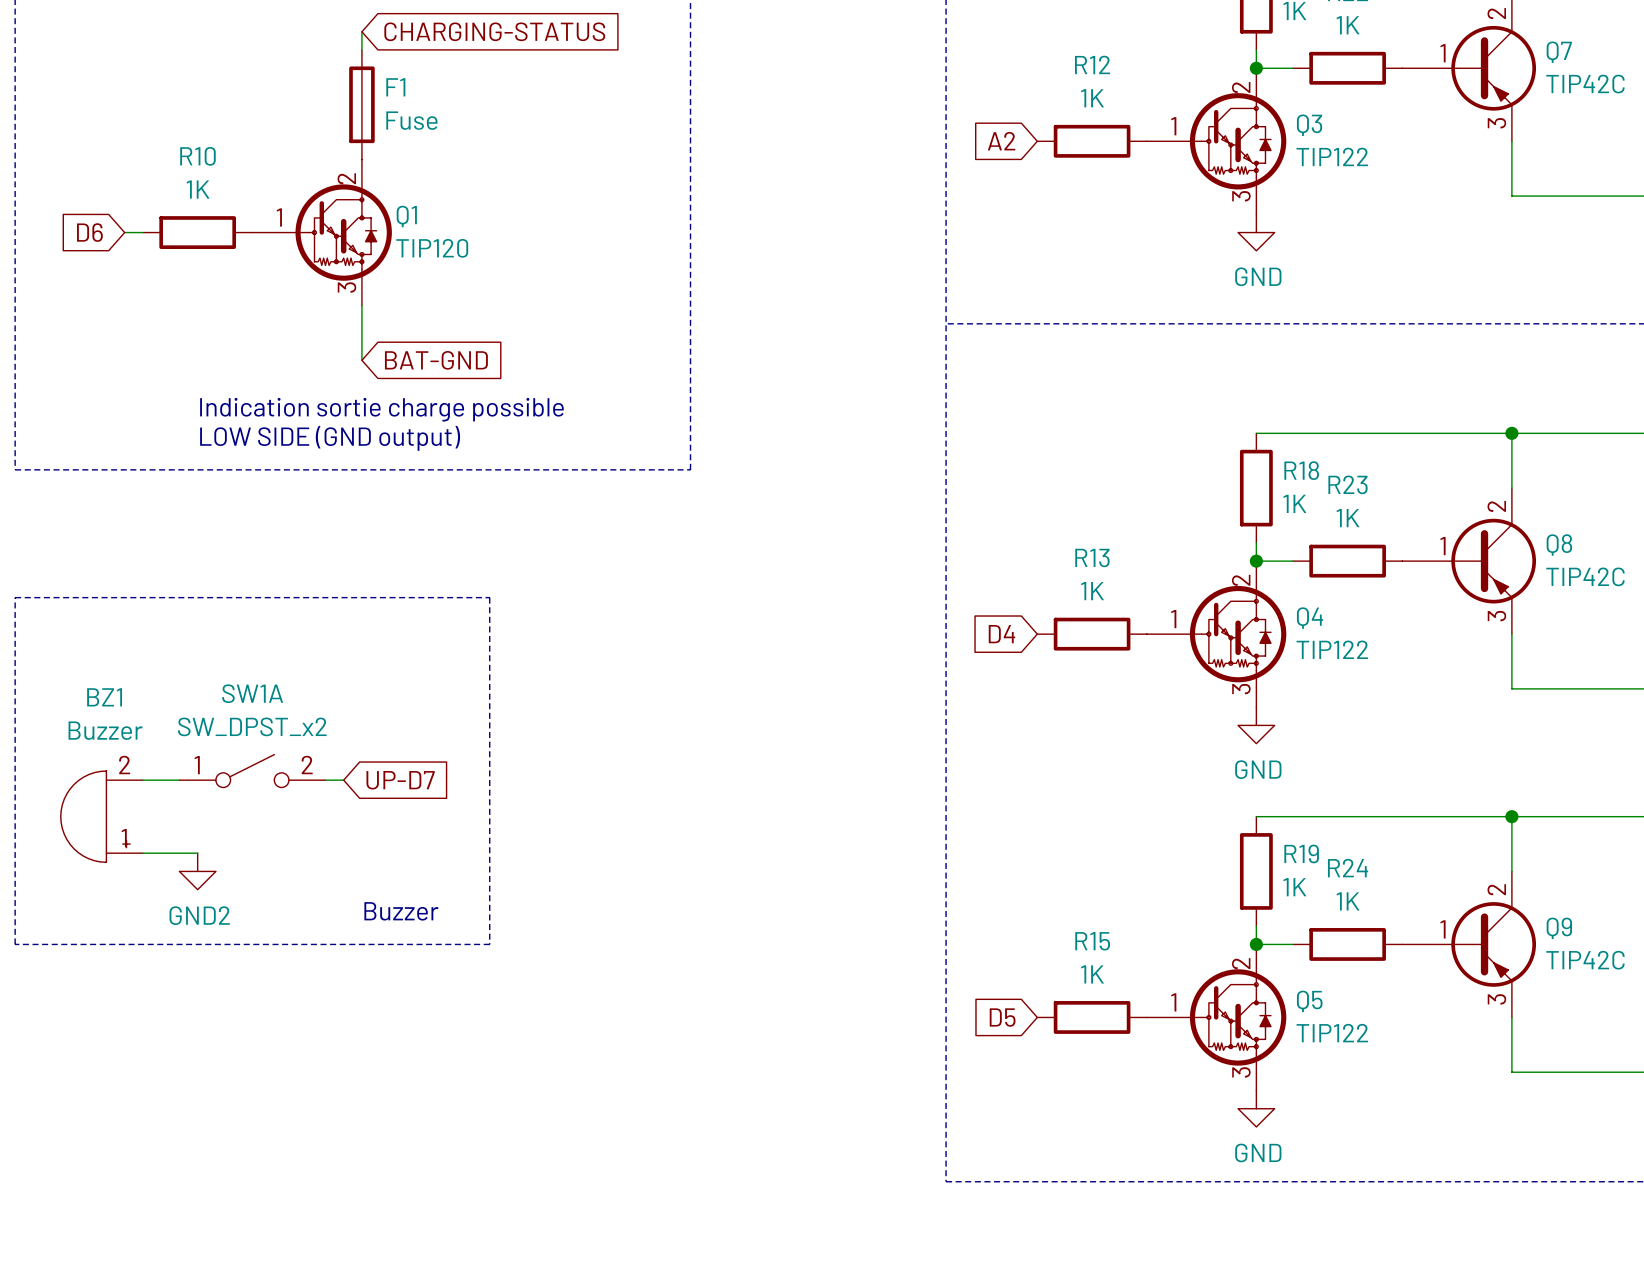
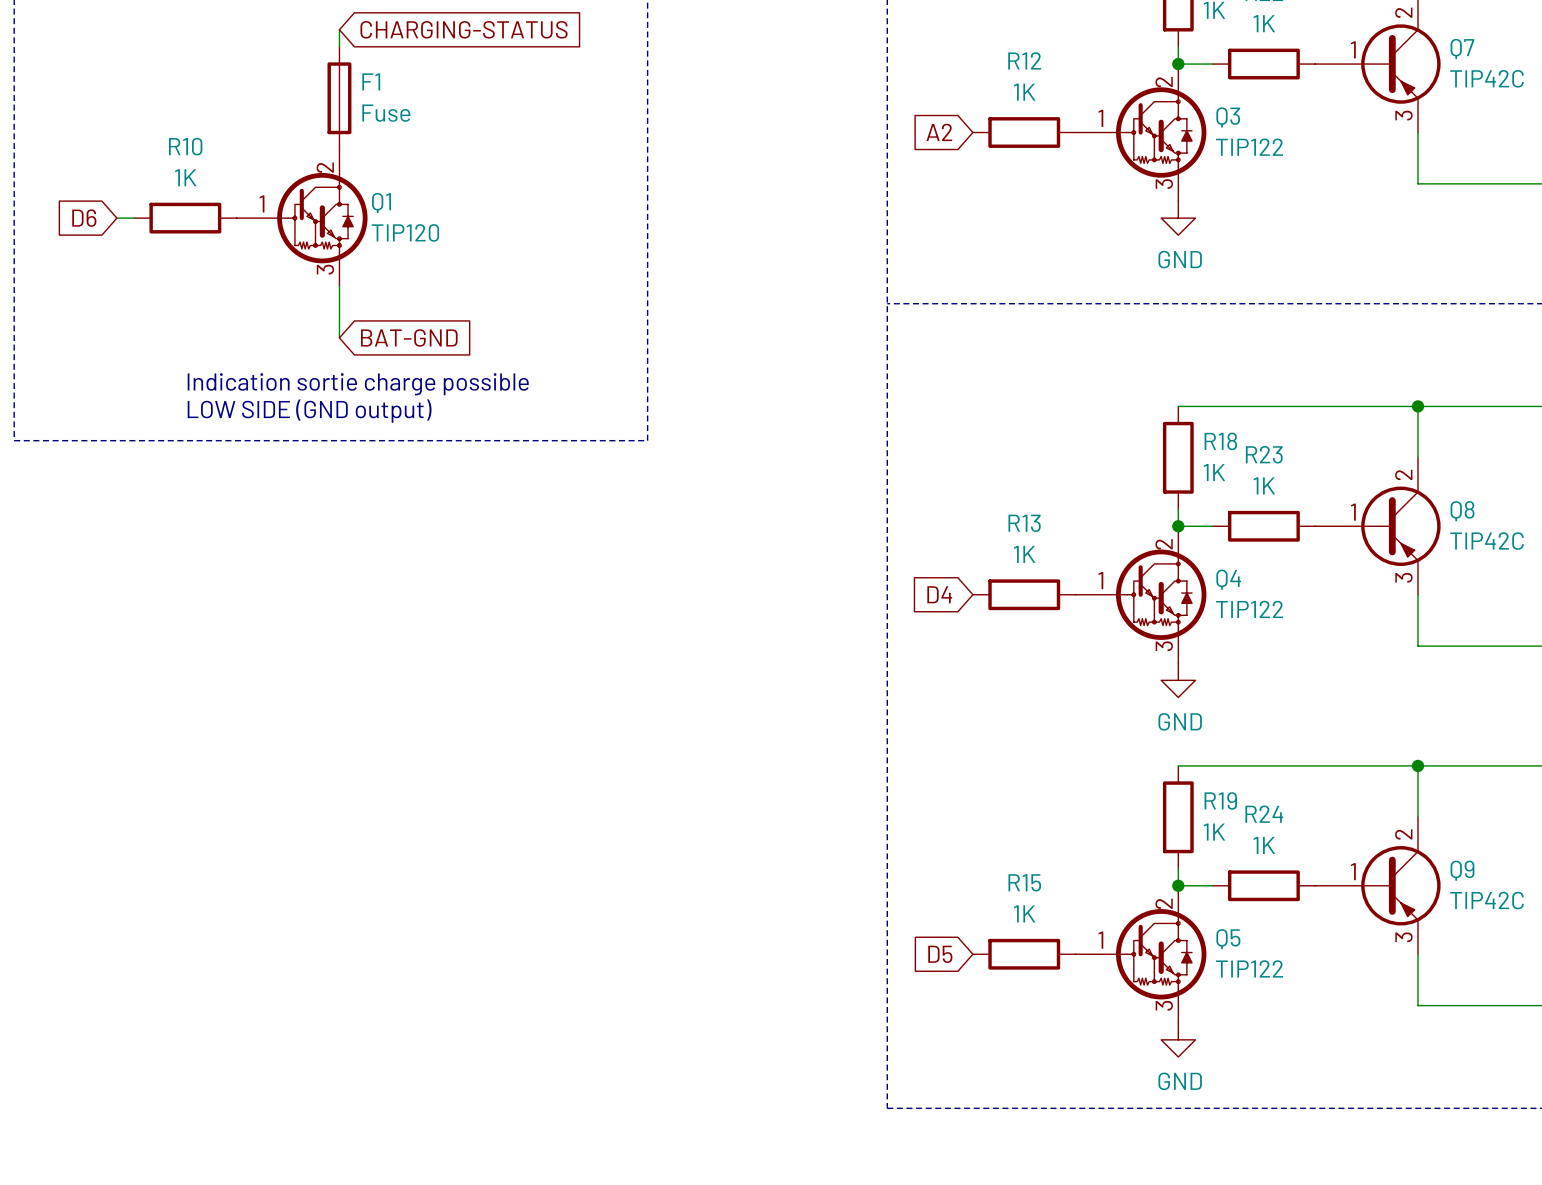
line: (15, 597) (15, 944) (489, 944) (489, 597) (15, 597) -> none
SW1A: SW_DPST_x2 (252, 771) -> none
wire: (142, 780) (179, 780) -> none
wire: (325, 780) (343, 780) -> none
global label: UP-D7 (400, 780) -> none
BZ1: Buzzer (101, 816) -> none
wire: (142, 853) (197, 853) -> none
power symbol: GND2 (197, 871) -> none
text: Buzzer (401, 911) -> none

